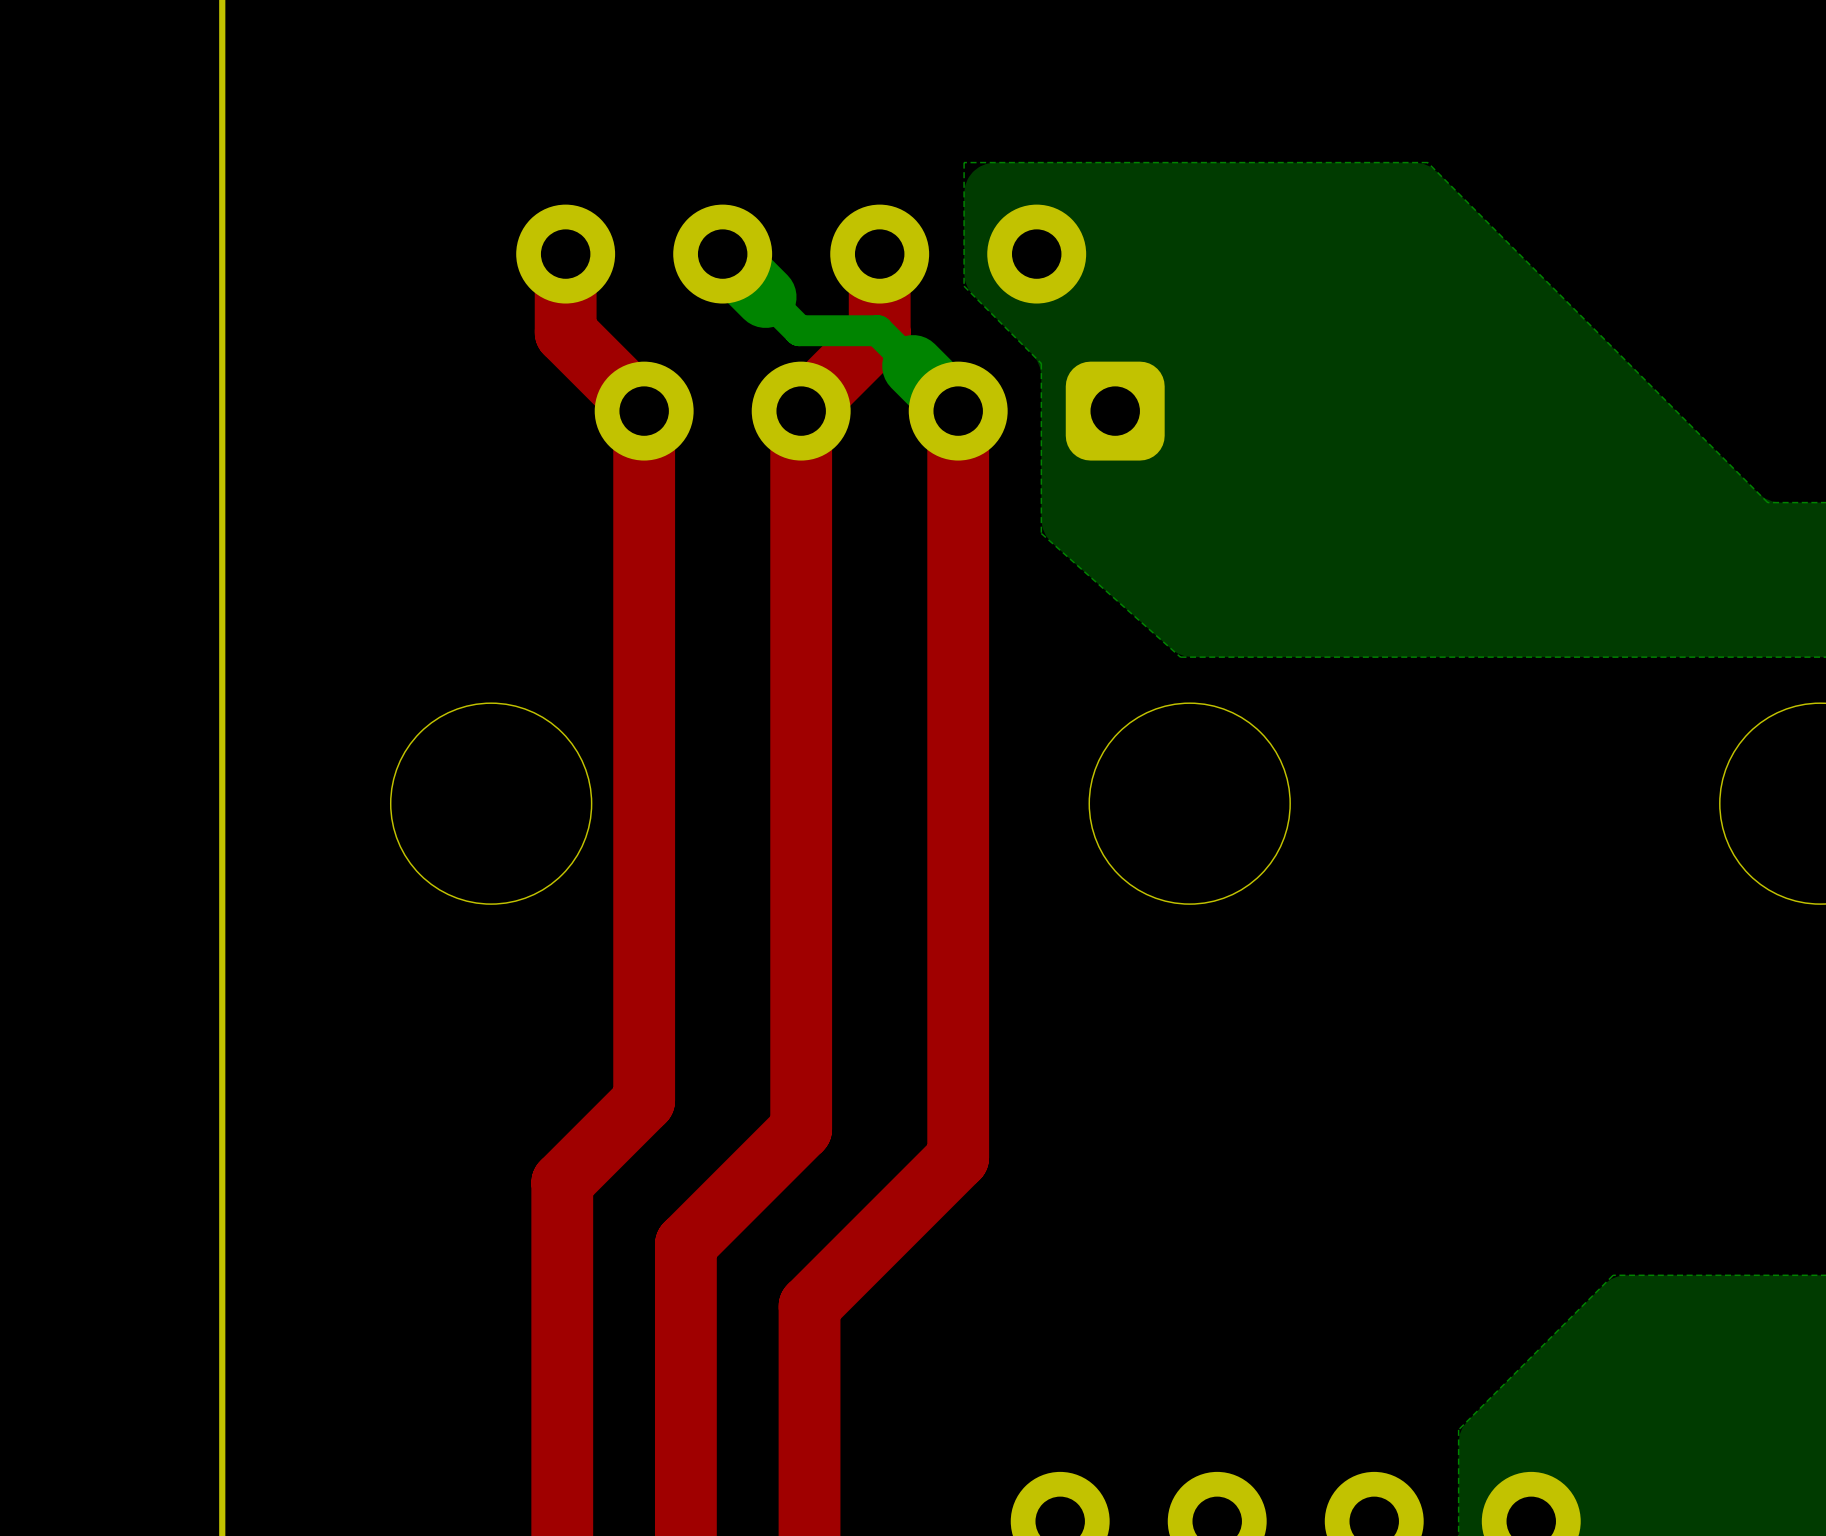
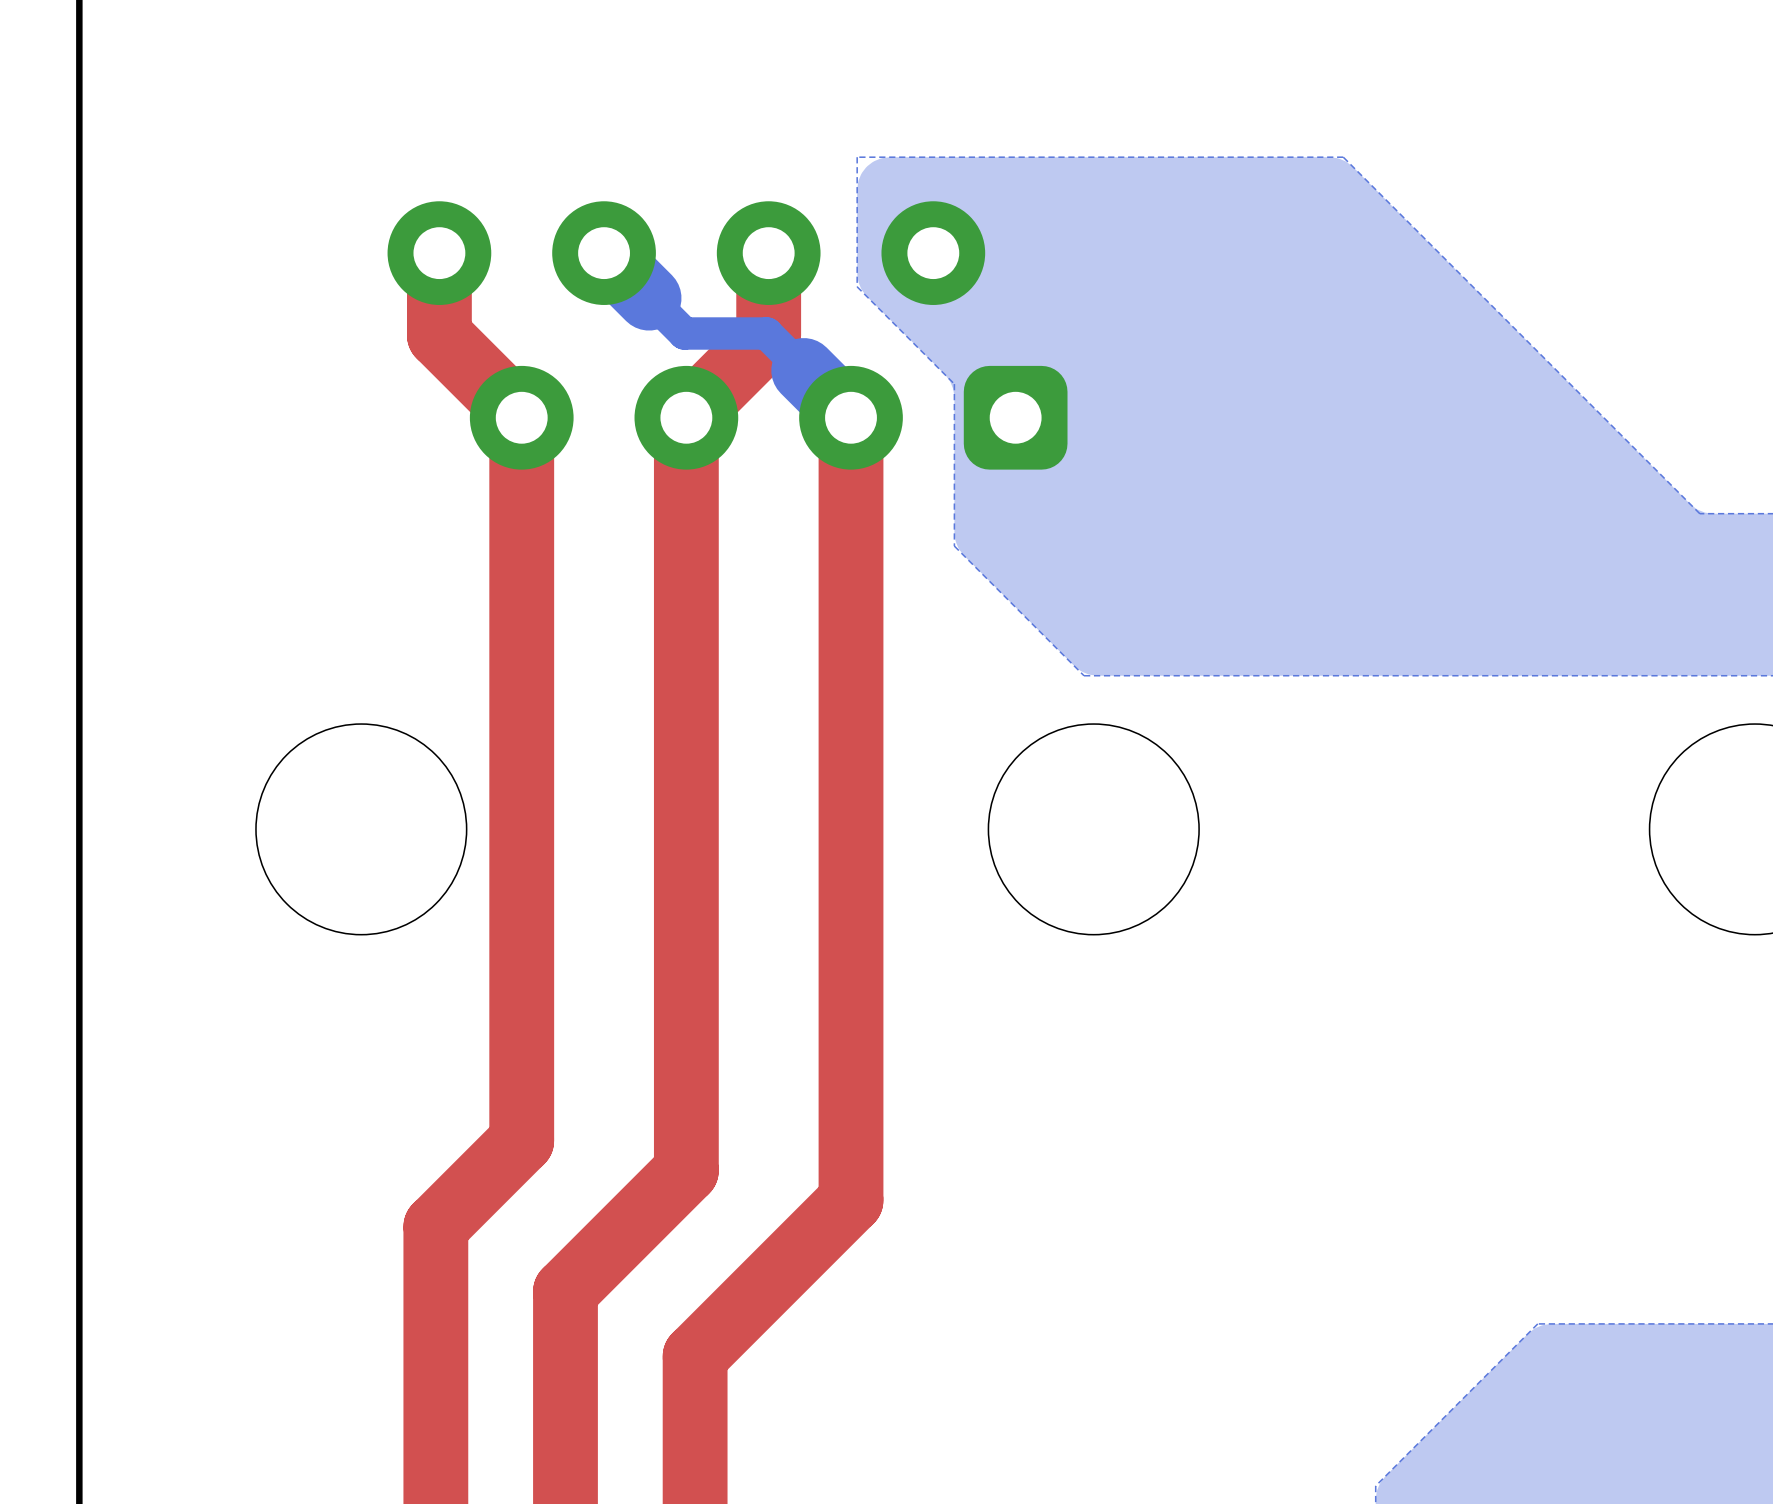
bottom zone outline: (1041, 363) (1041, 533) (1180, 657) -> (938, 367) (954, 384) (954, 546) (1084, 675)

